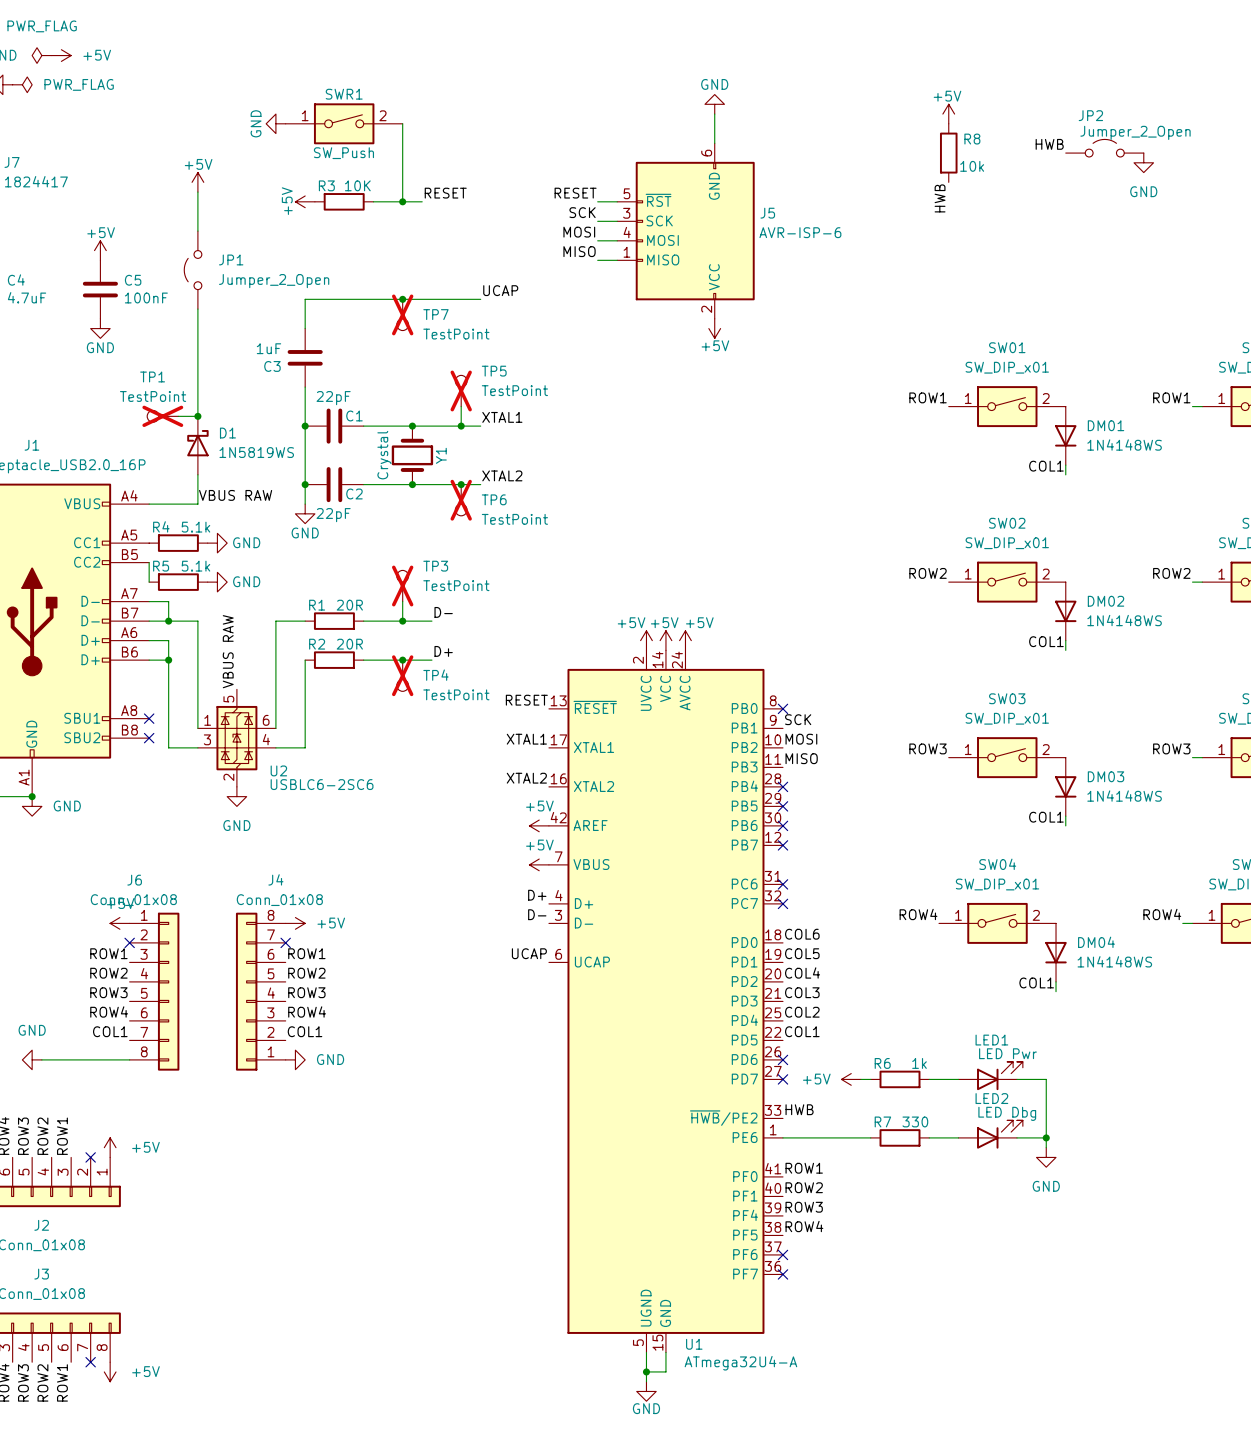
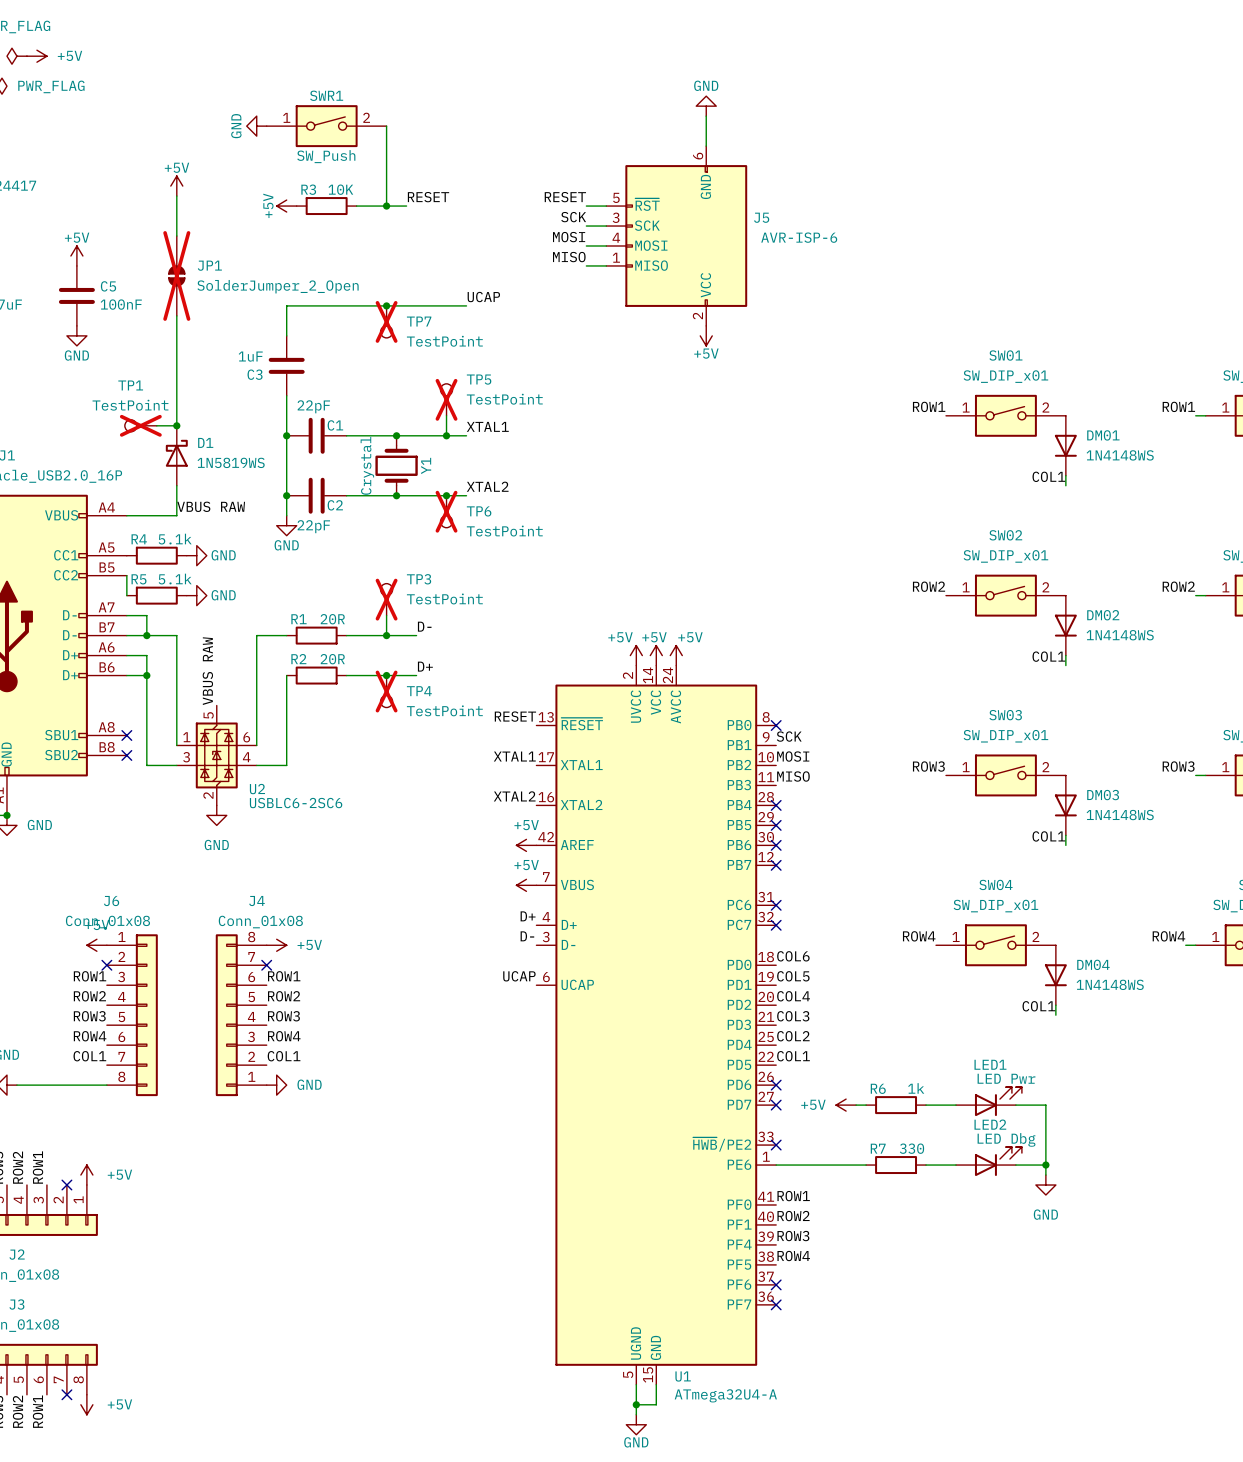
power symbol: +5V (948, 114) -> none
label: HWB (1049, 144) -> none
JP2: Jumper_2_Open (1104, 148) -> none
R8: 10k (948, 153) -> none
power symbol: GND (1143, 162) -> none
label: HWB (940, 198) -> none
JP1 symbol: [184, 231, 202, 310] -> [168, 236, 186, 316]
JP1 do-not-place cross: none -> (176, 275)
JP1 value: Jumper_2_Open (274, 281) -> SolderJumper_2_Open (278, 286)
label: HWB (799, 1109) -> none
no-connect mark: none -> (776, 1145)

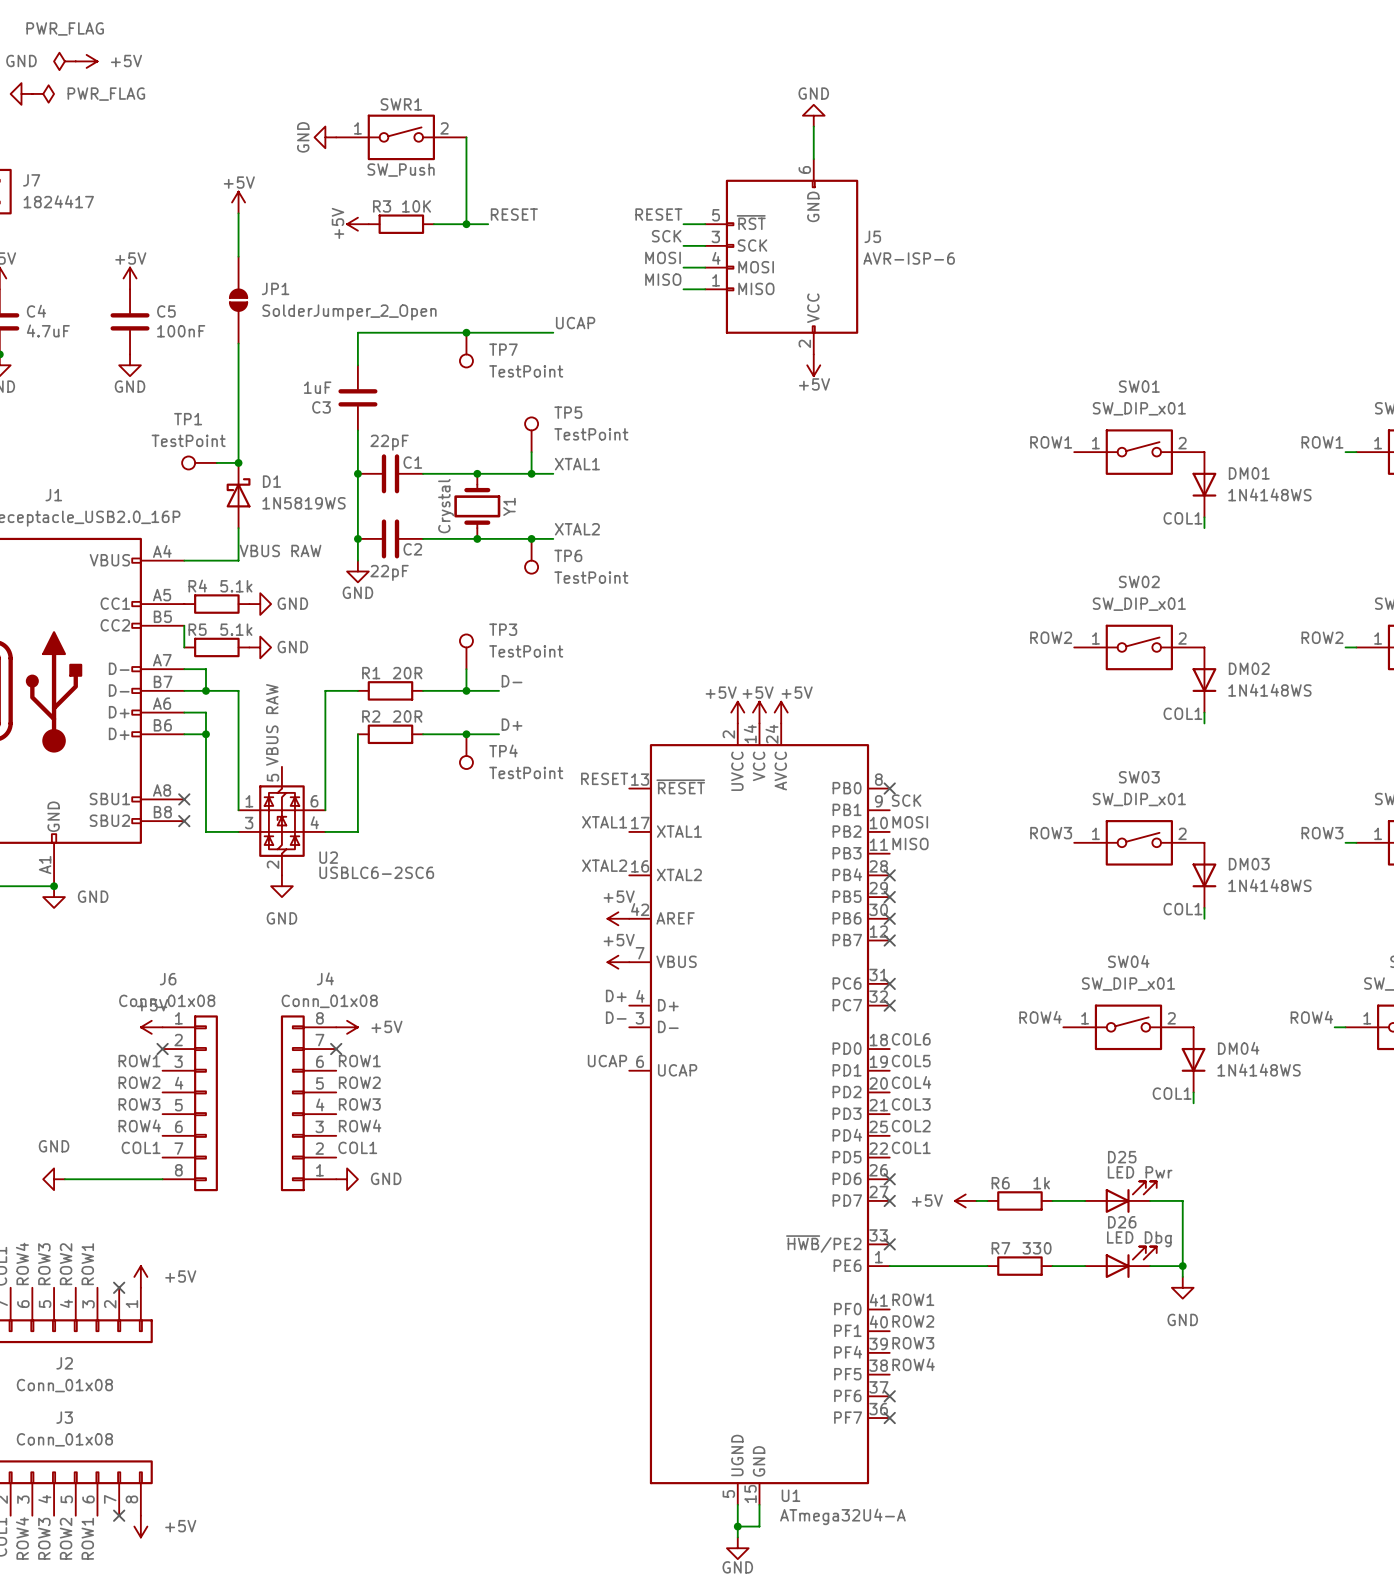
JP1 do-not-place cross: (176, 275) -> none
TP7 do-not-place cross: (386, 321) -> none
TP5 do-not-place cross: (446, 399) -> none
TP1 do-not-place cross: (140, 425) -> none
TP6 do-not-place cross: (446, 511) -> none
TP3 do-not-place cross: (386, 599) -> none
TP4 do-not-place cross: (386, 691) -> none
LED1 name: LED1 (990, 1064) -> D25 (1122, 1157)
LED2 name: LED2 (990, 1124) -> D26 (1122, 1222)

